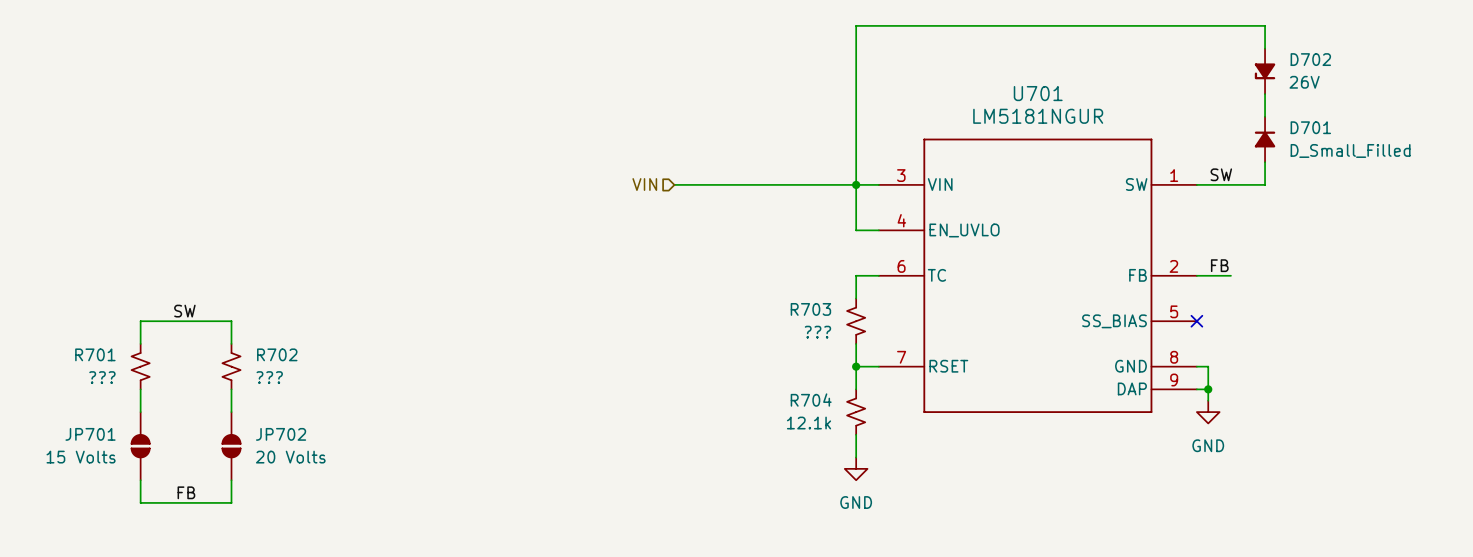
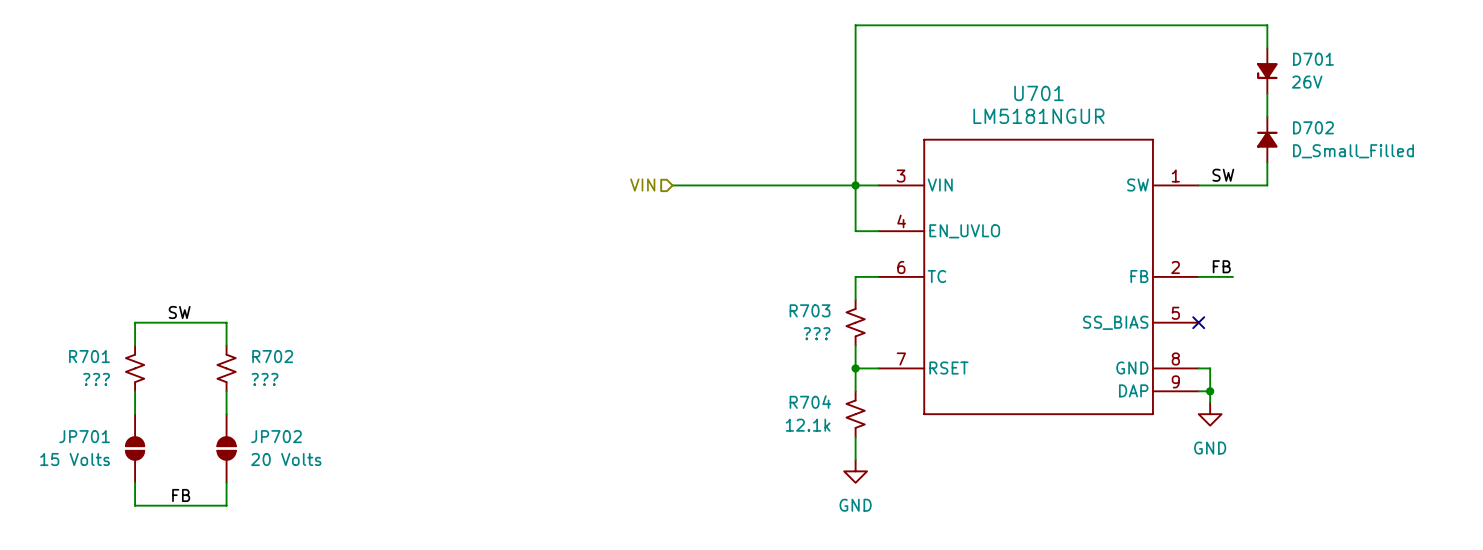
D702 name: D702 (1310, 59) -> D701 (1313, 59)
D701 name: D701 (1310, 127) -> D702 (1313, 127)

